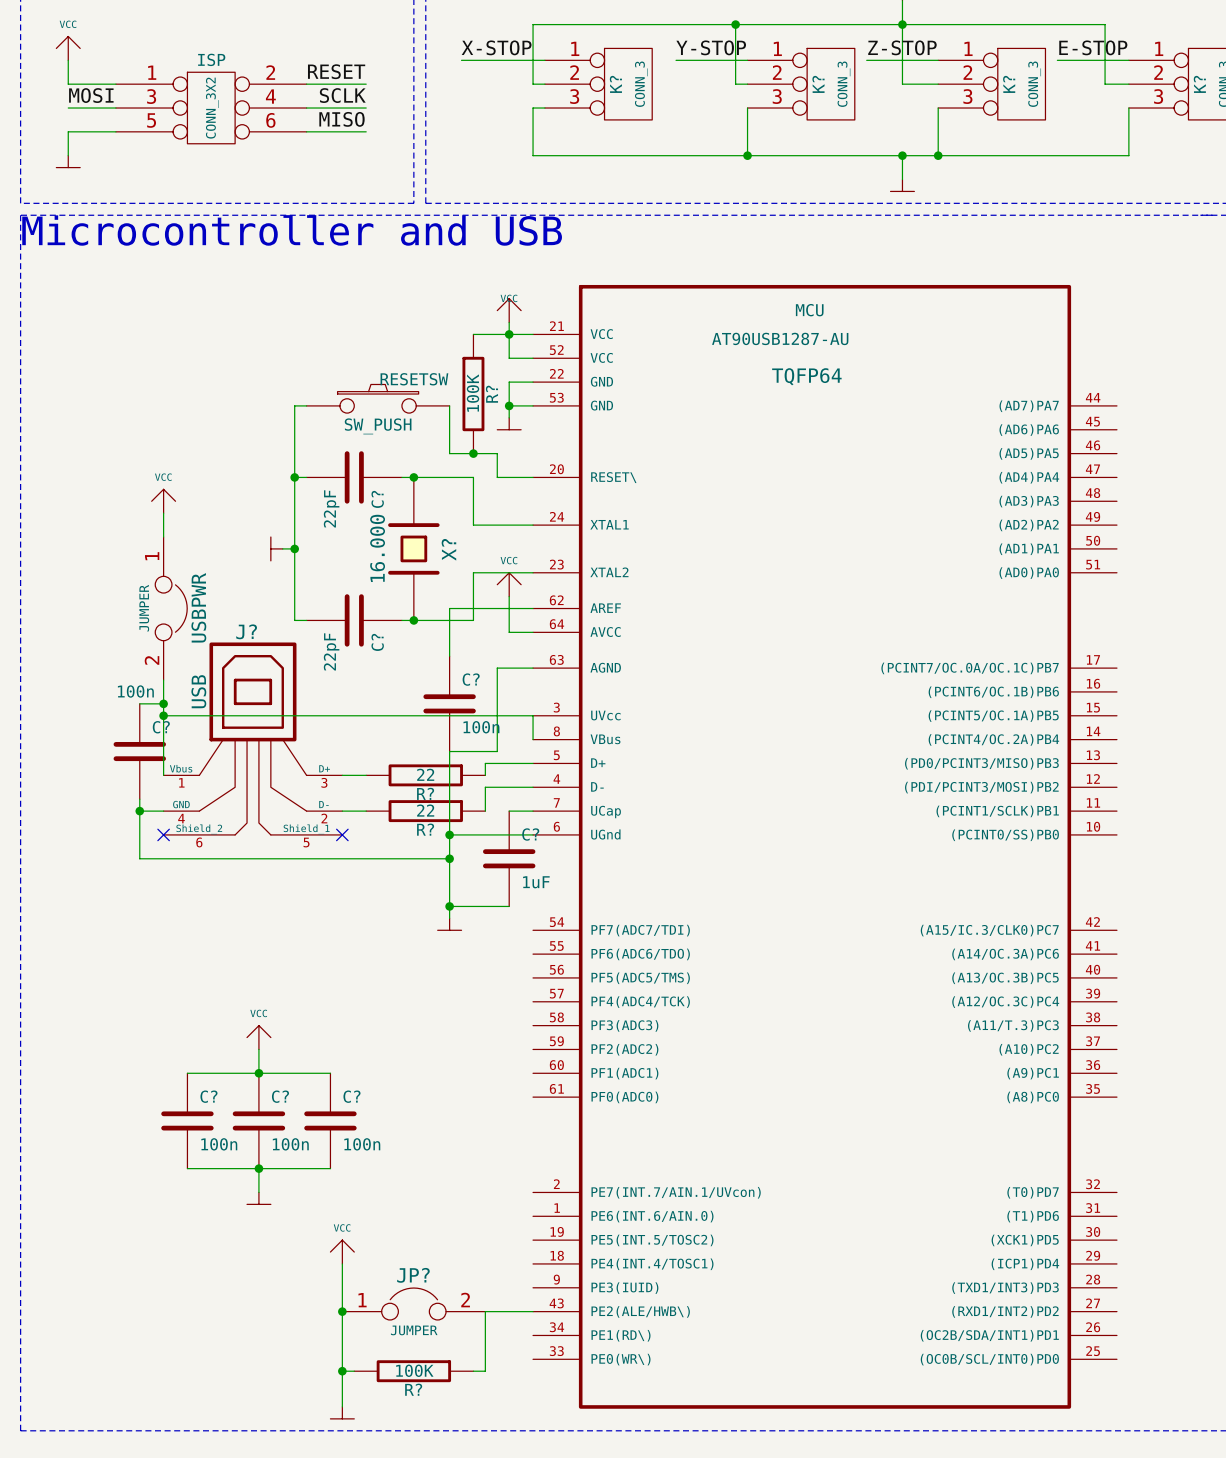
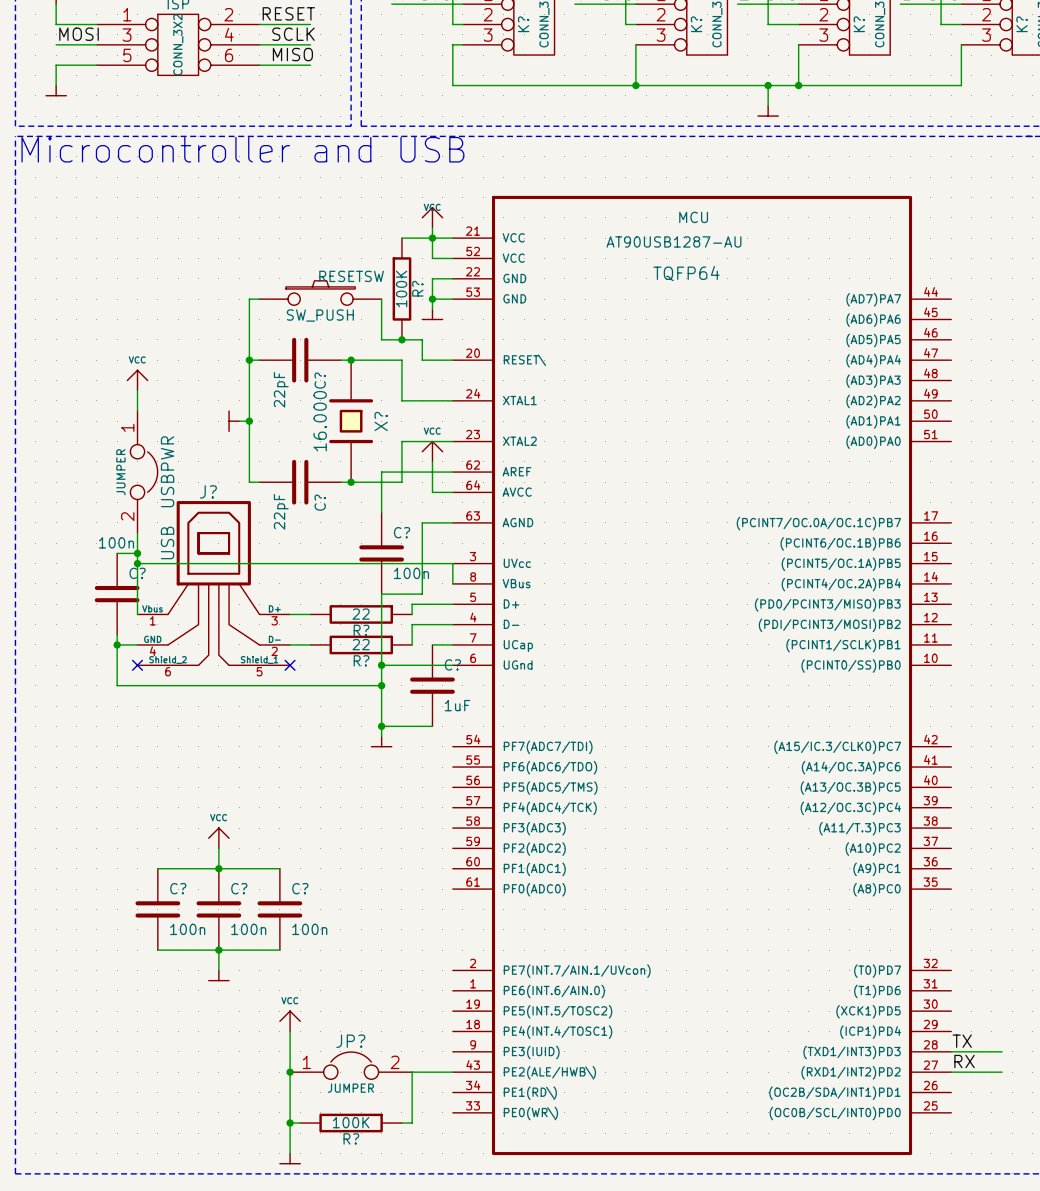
label: none -> TX (962, 1041)
wire: none -> (951, 1051) (1002, 1051)
label: none -> RX (964, 1061)
wire: none -> (951, 1072) (1002, 1072)

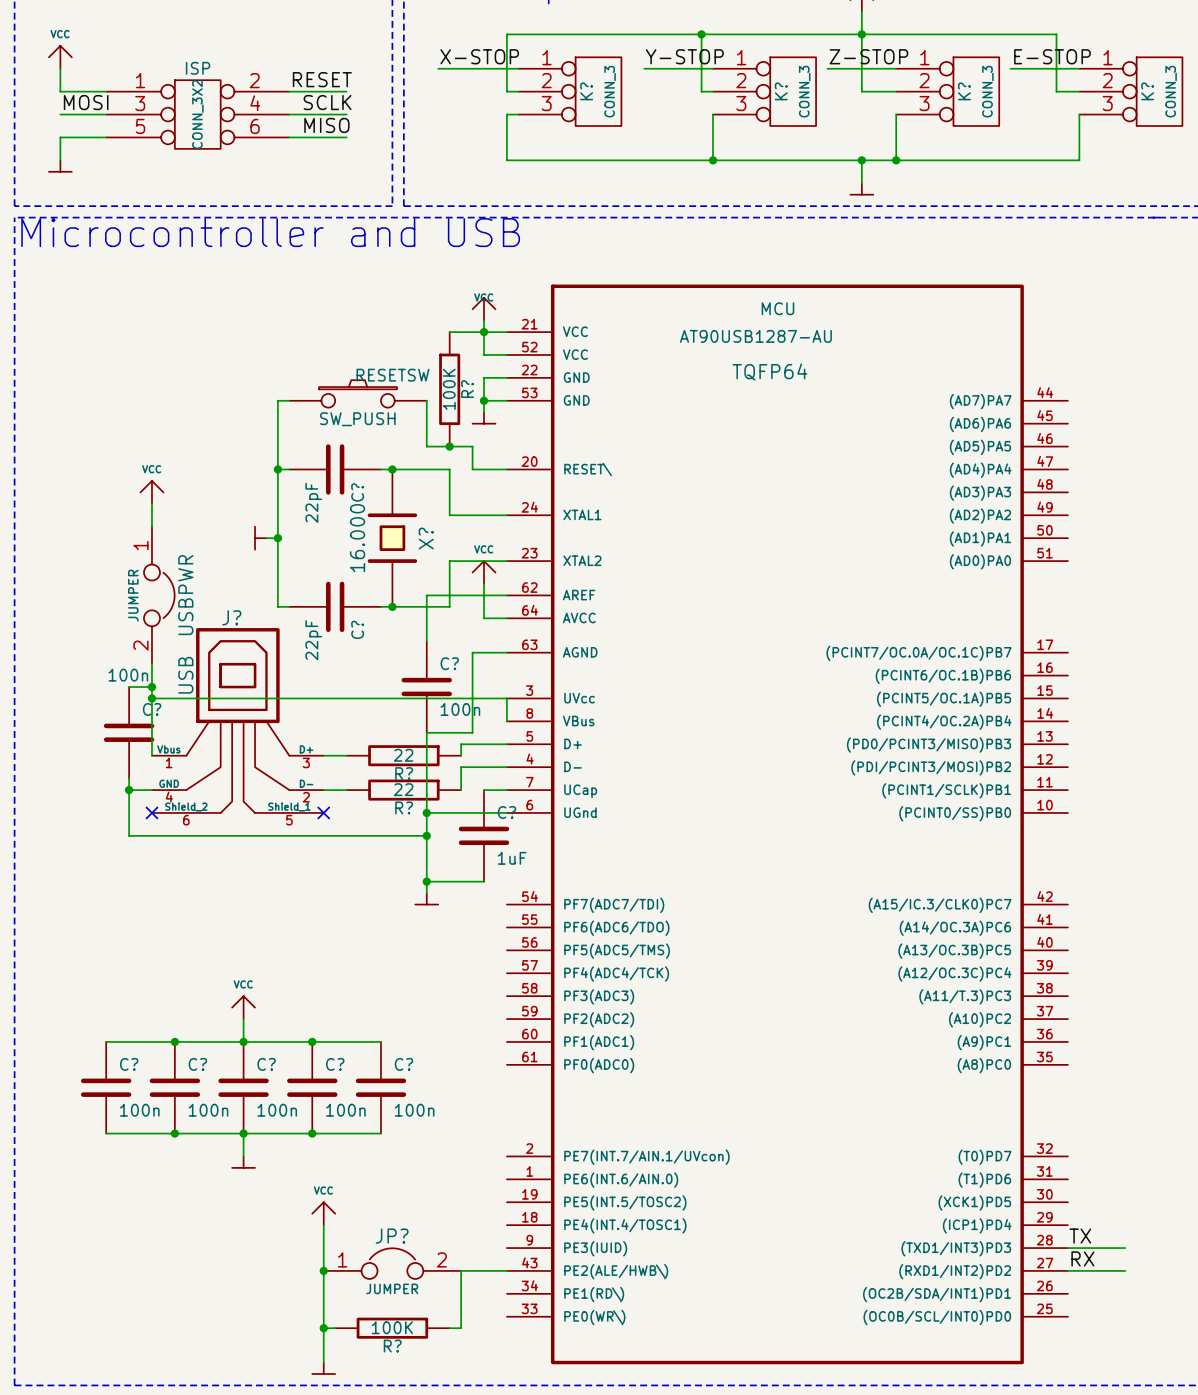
wire: none -> (106, 1041) (174, 1041)
junction: none -> (174, 1041)
wire: none -> (312, 1041) (380, 1041)
junction: none -> (312, 1041)
C?: none -> 100n (106, 1087)
C?: none -> 100n (380, 1087)
wire: none -> (106, 1133) (174, 1133)
junction: none -> (174, 1133)
wire: none -> (312, 1133) (380, 1133)
junction: none -> (312, 1133)

